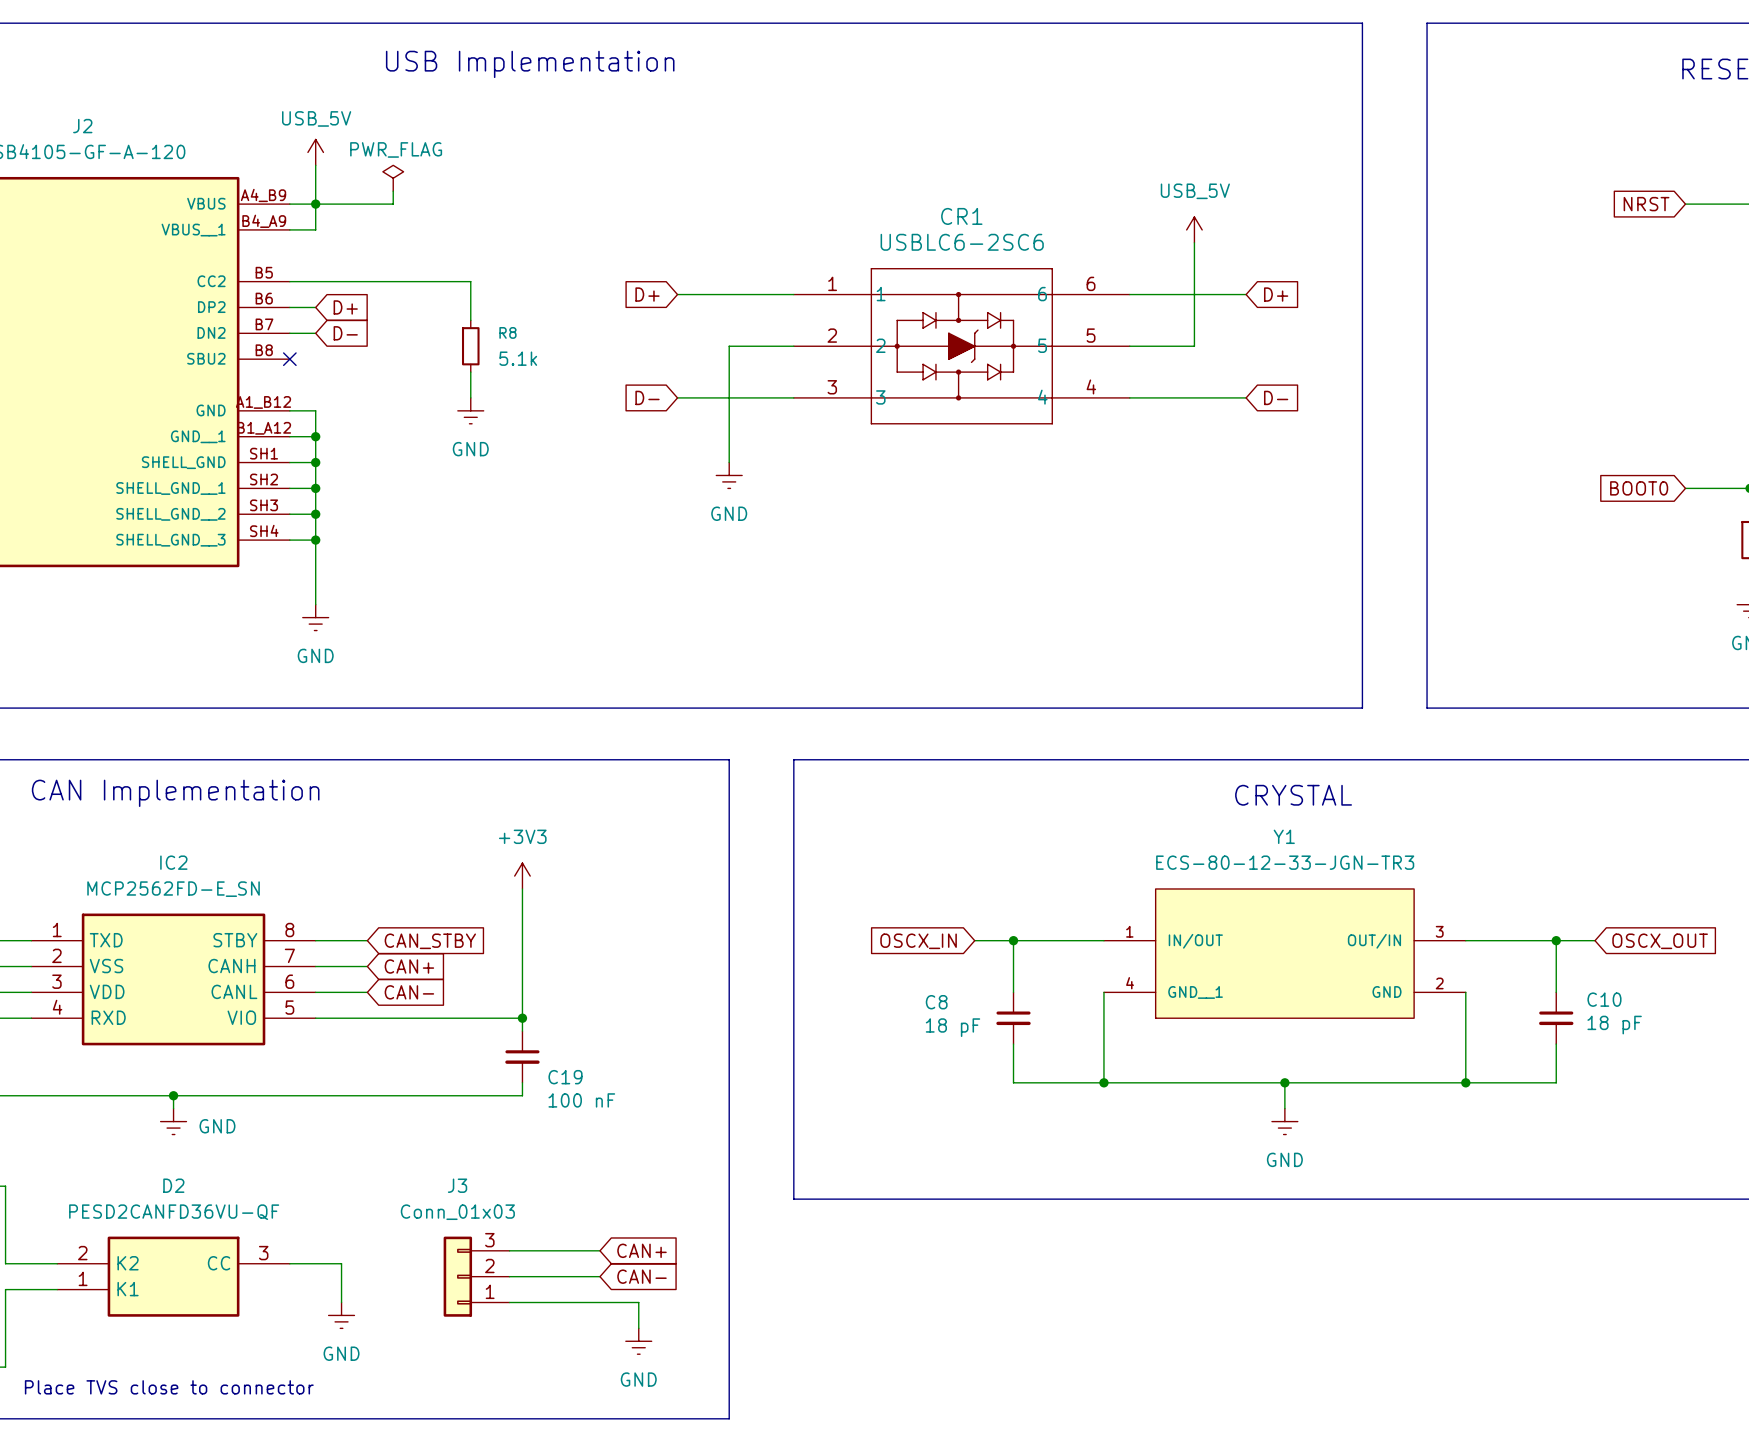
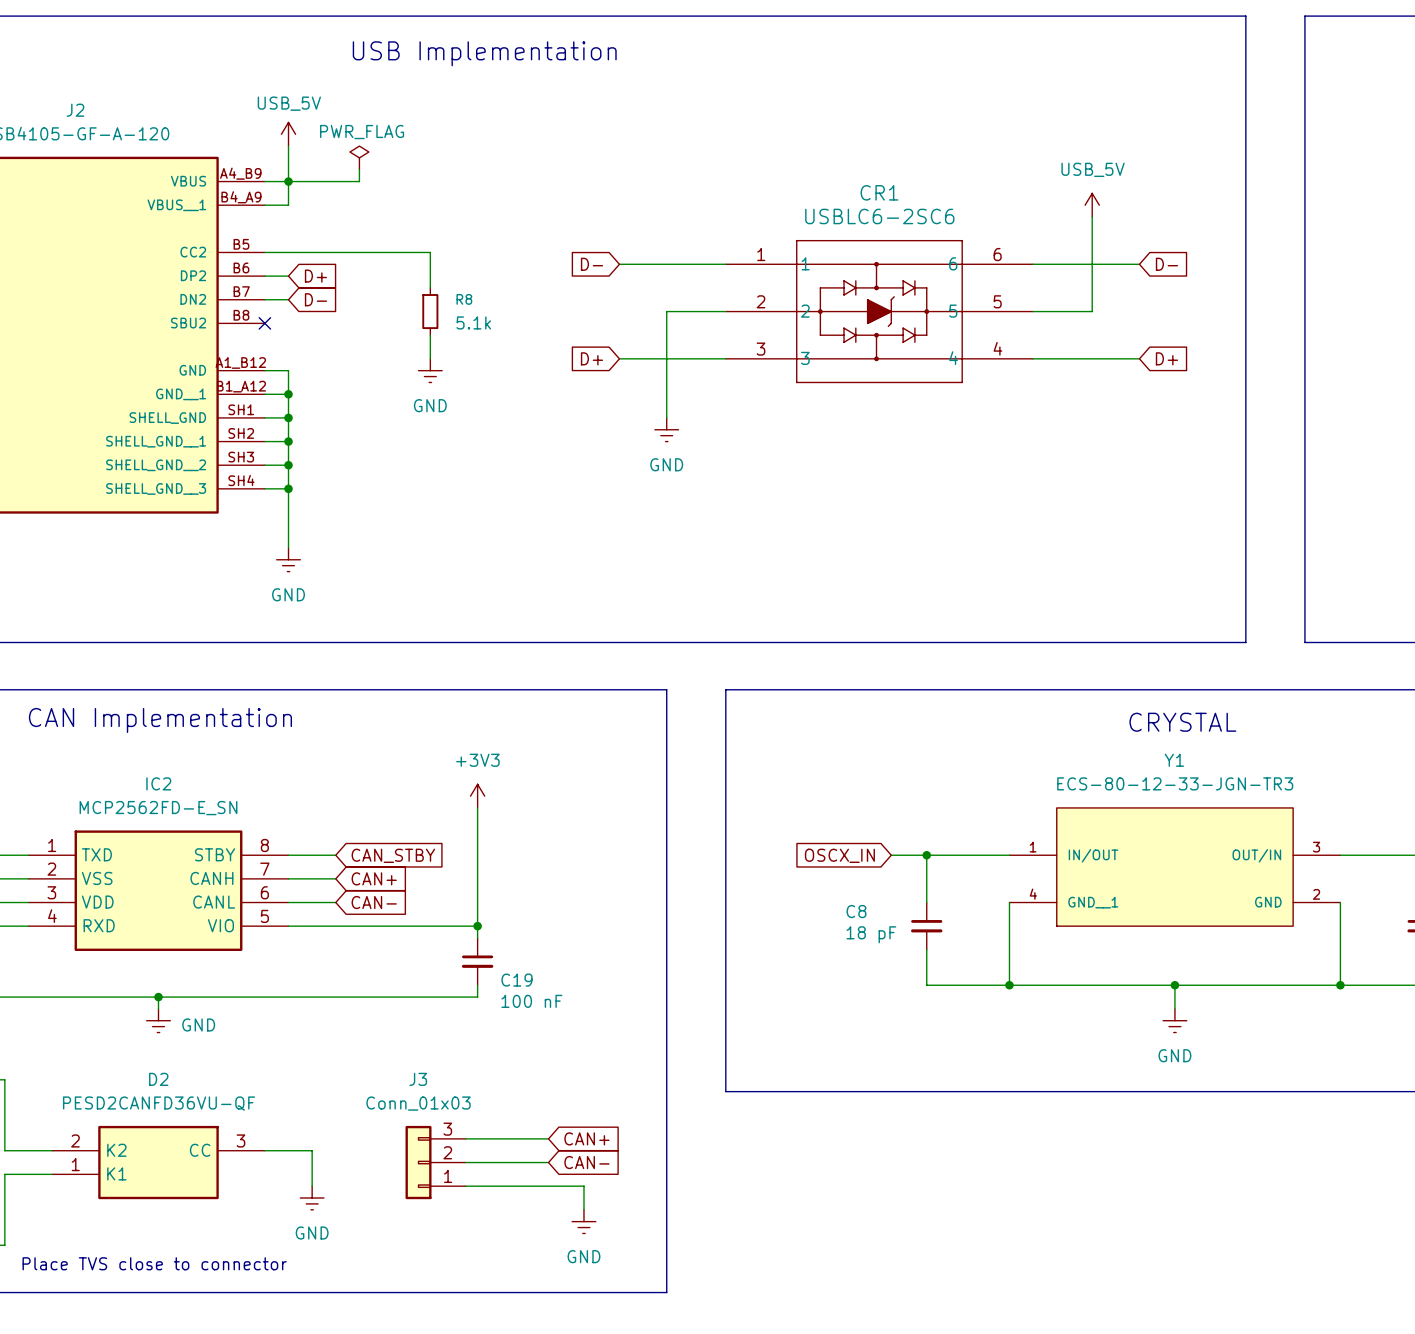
global label: D+ (647, 294) -> D- (591, 264)
global label: D+ (1276, 294) -> D- (1166, 264)
global label: D- (647, 397) -> D+ (591, 358)
global label: D- (1276, 397) -> D+ (1166, 358)

